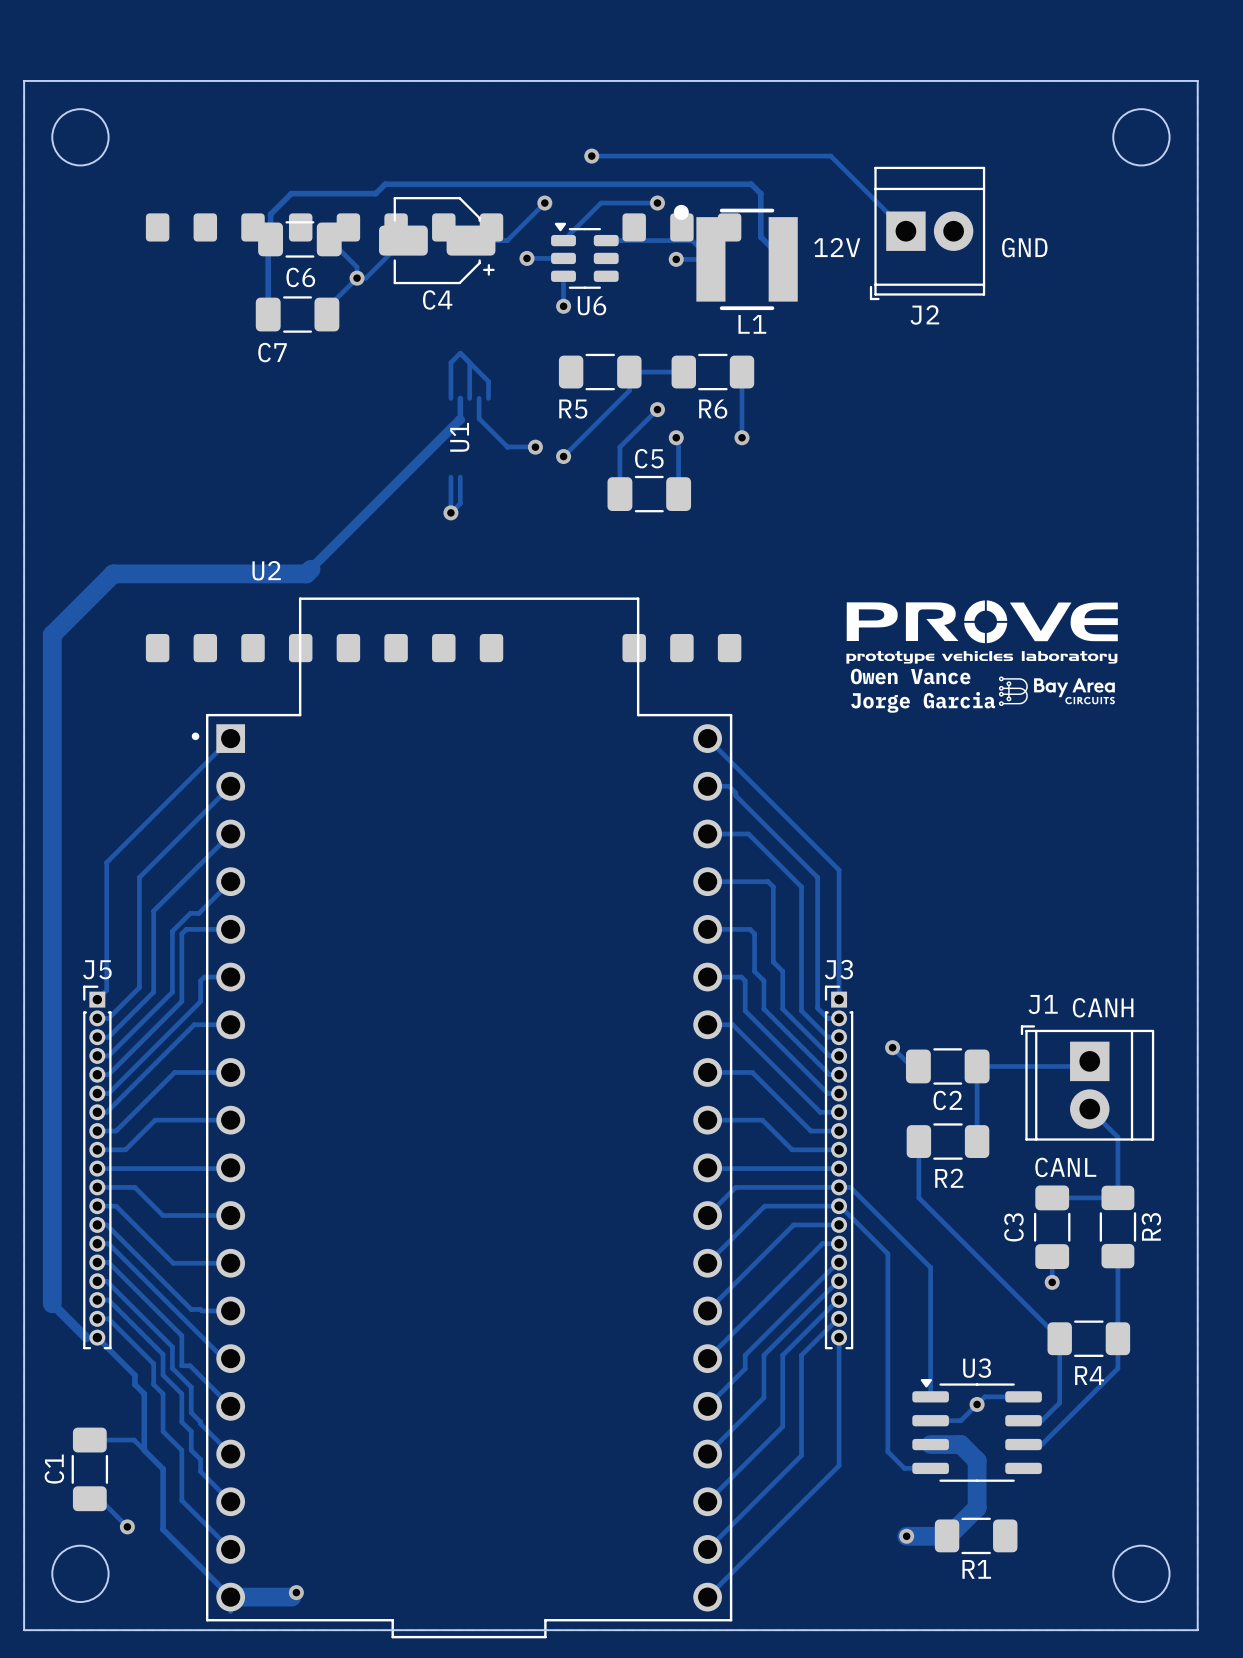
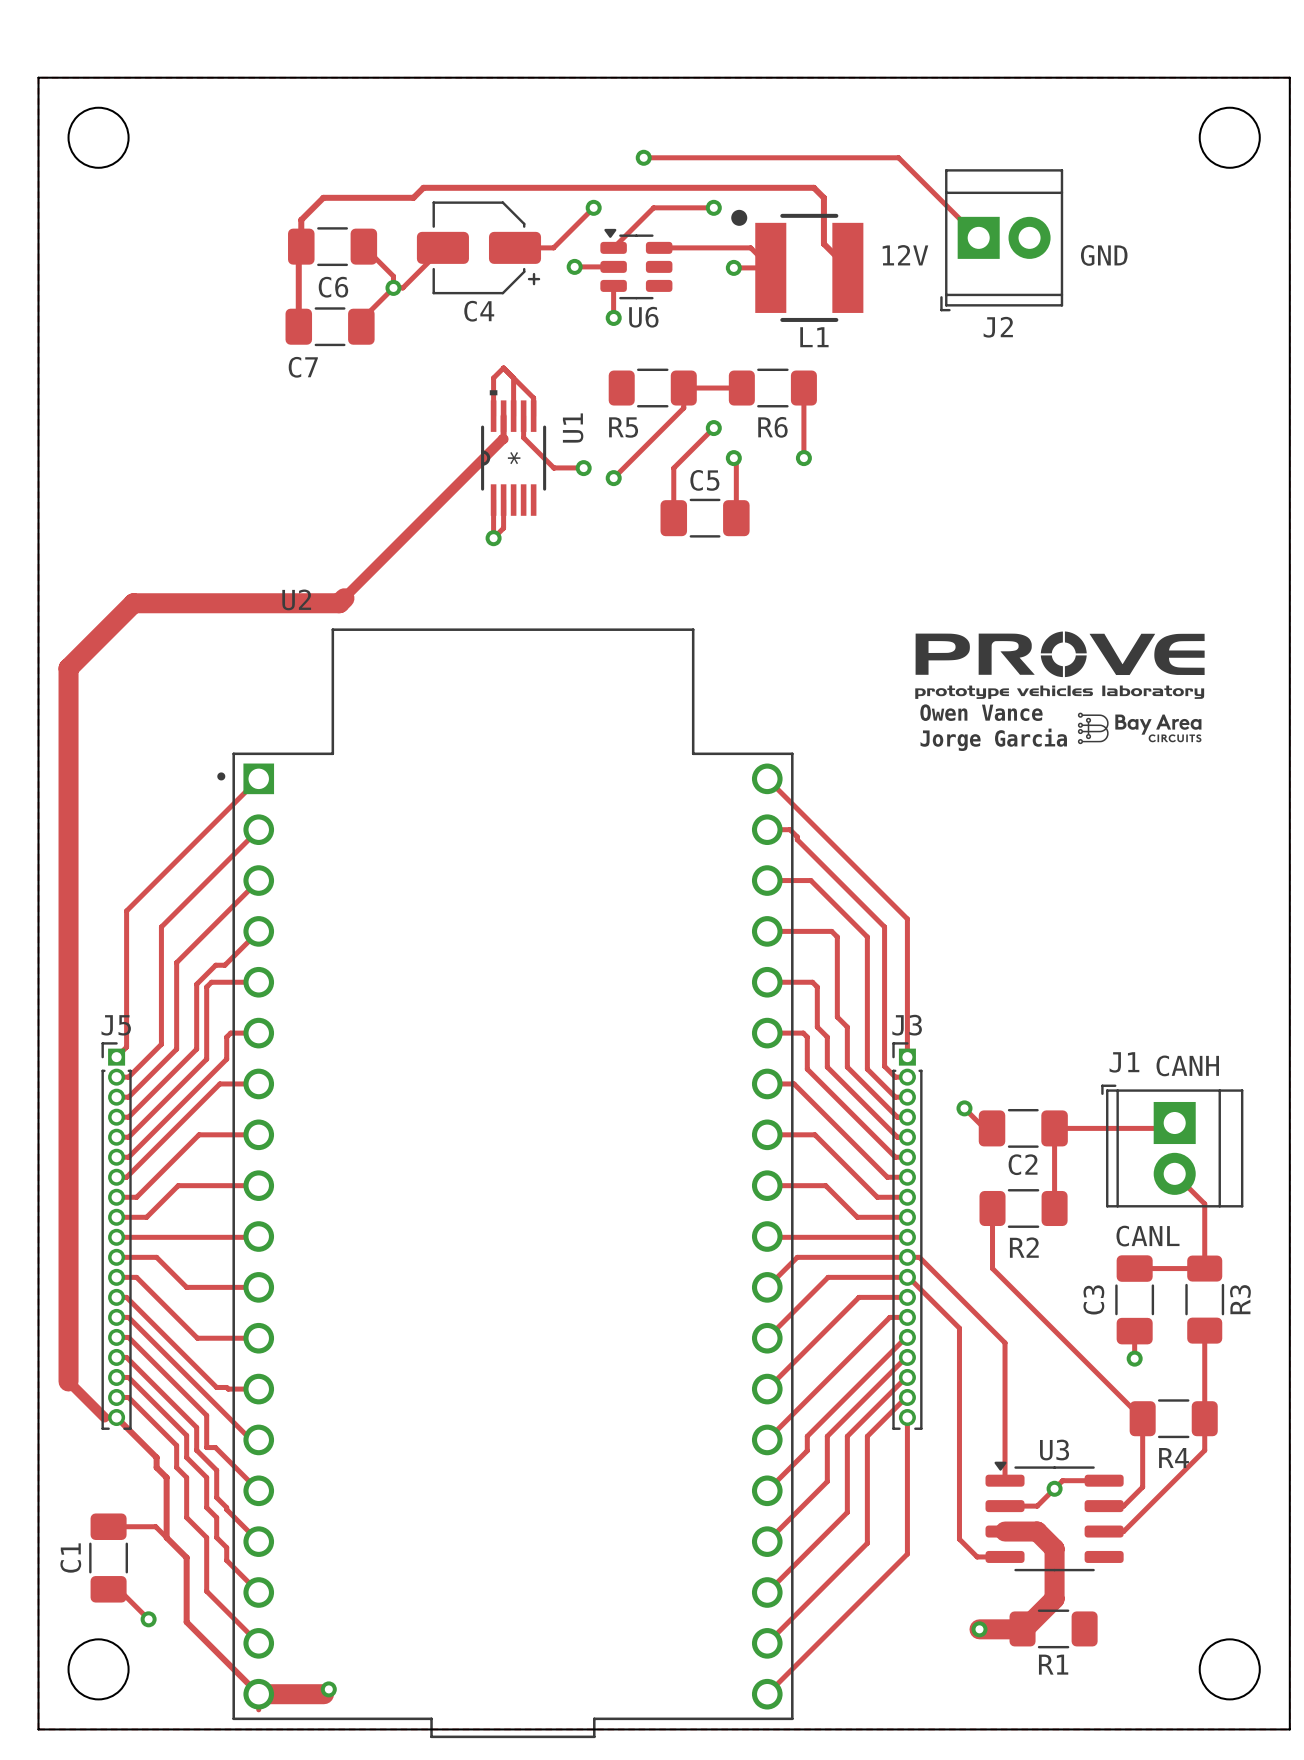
U1 footprint: [145, 213, 742, 663] -> [481, 390, 547, 516]
U1 name position: U1 (459, 437) -> U1 (573, 428)

